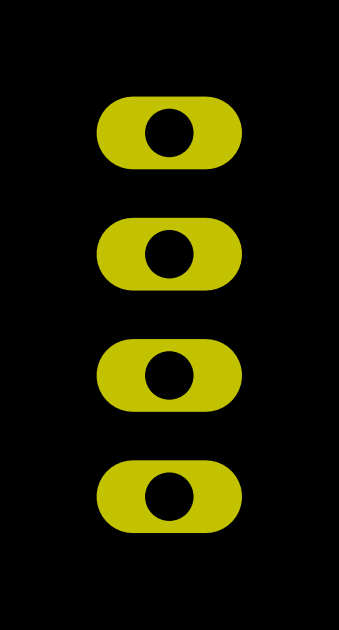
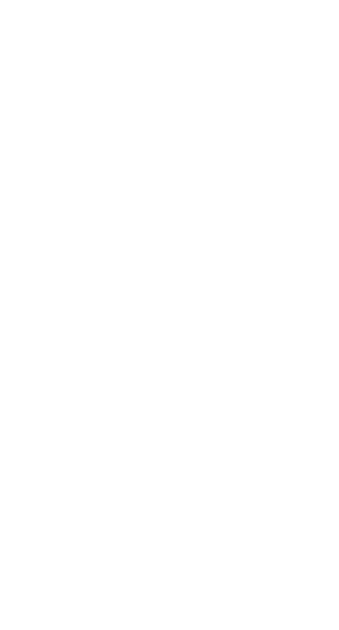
part: (169, 314) -> none

